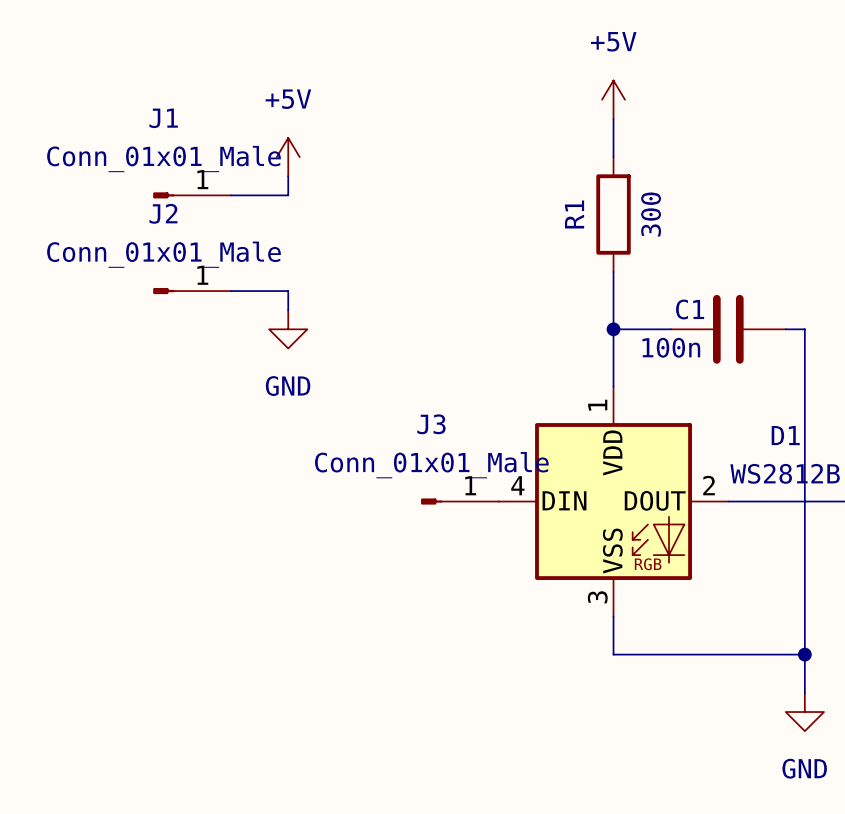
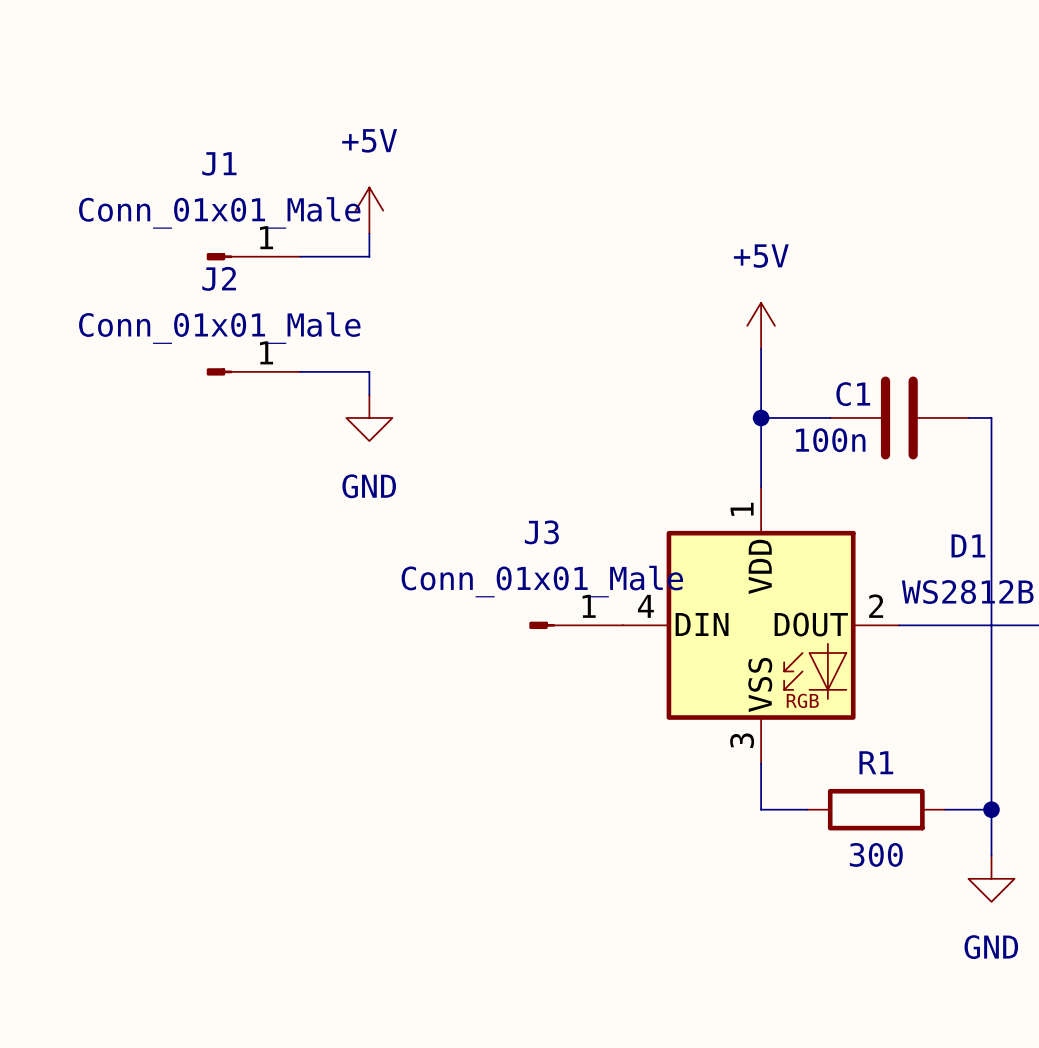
power symbol position: +5V (613, 99) -> +5V (761, 325)
wire: (613, 118) (613, 157) -> none
R1 rotation: 0° (613, 214) -> 90° clockwise (876, 809)
R1 position: (613, 214) -> (876, 809)
wire: (651, 654) (766, 654) -> none

